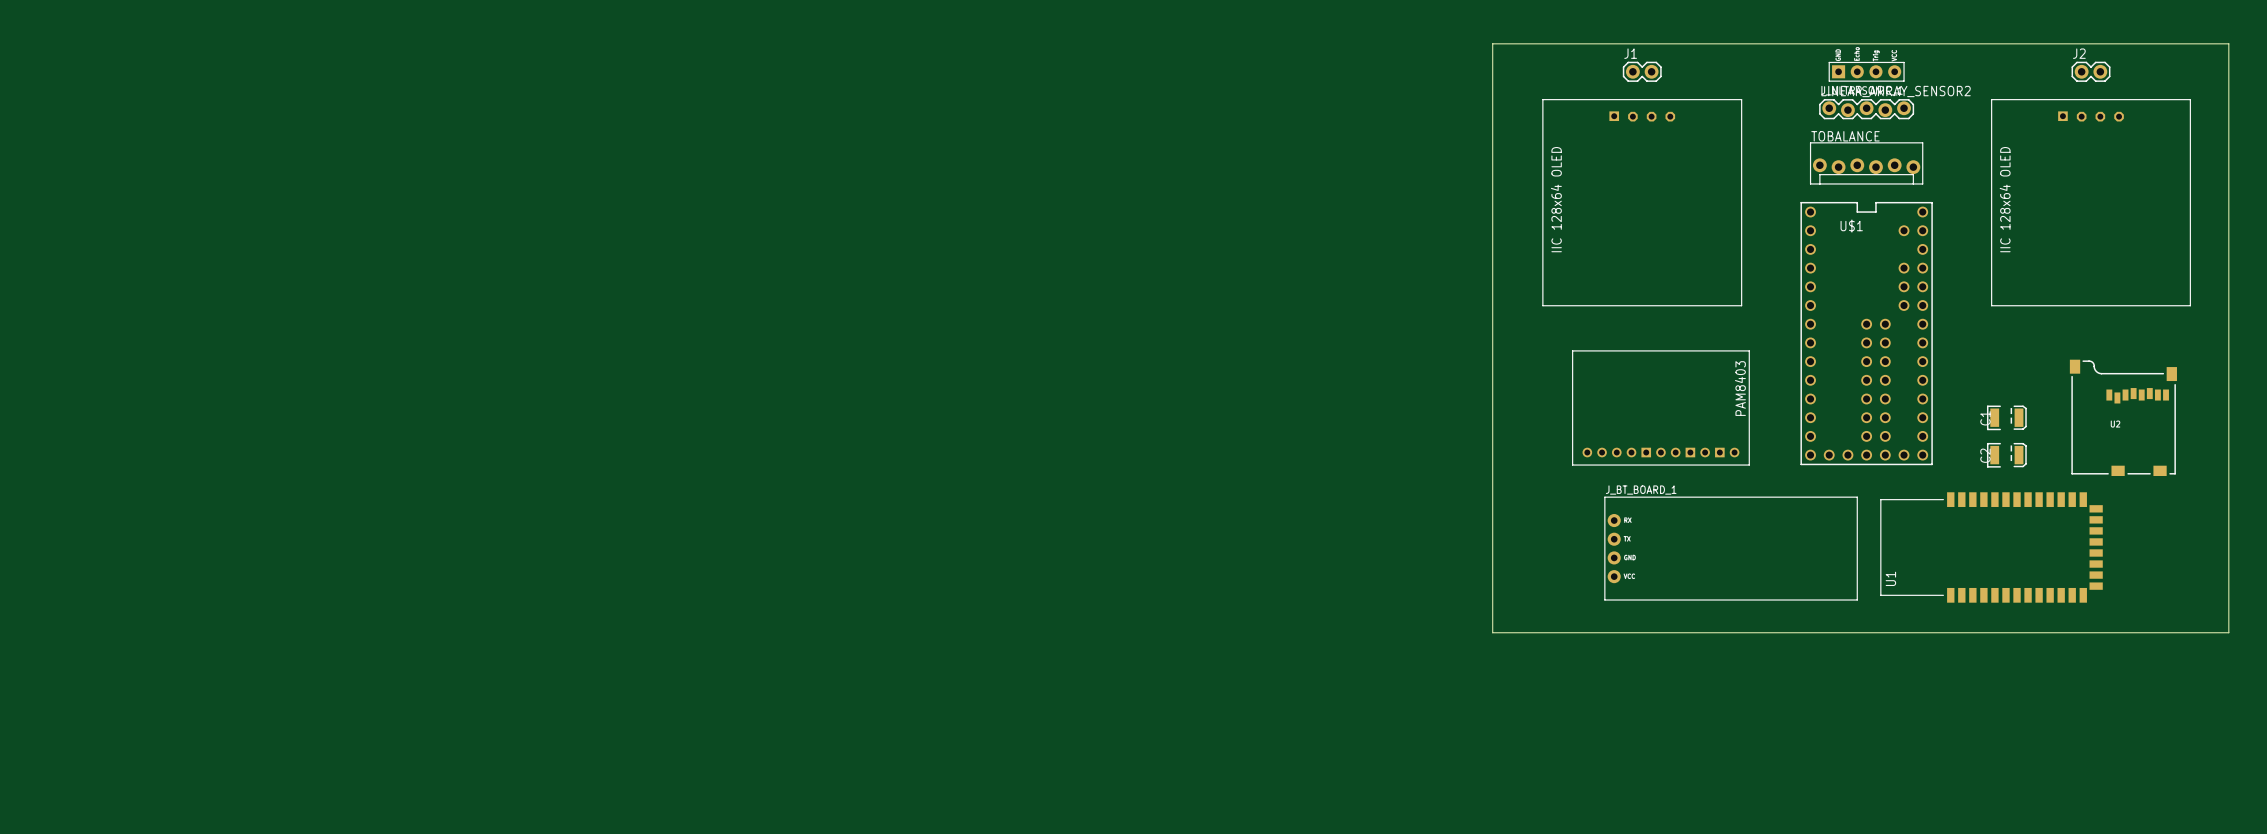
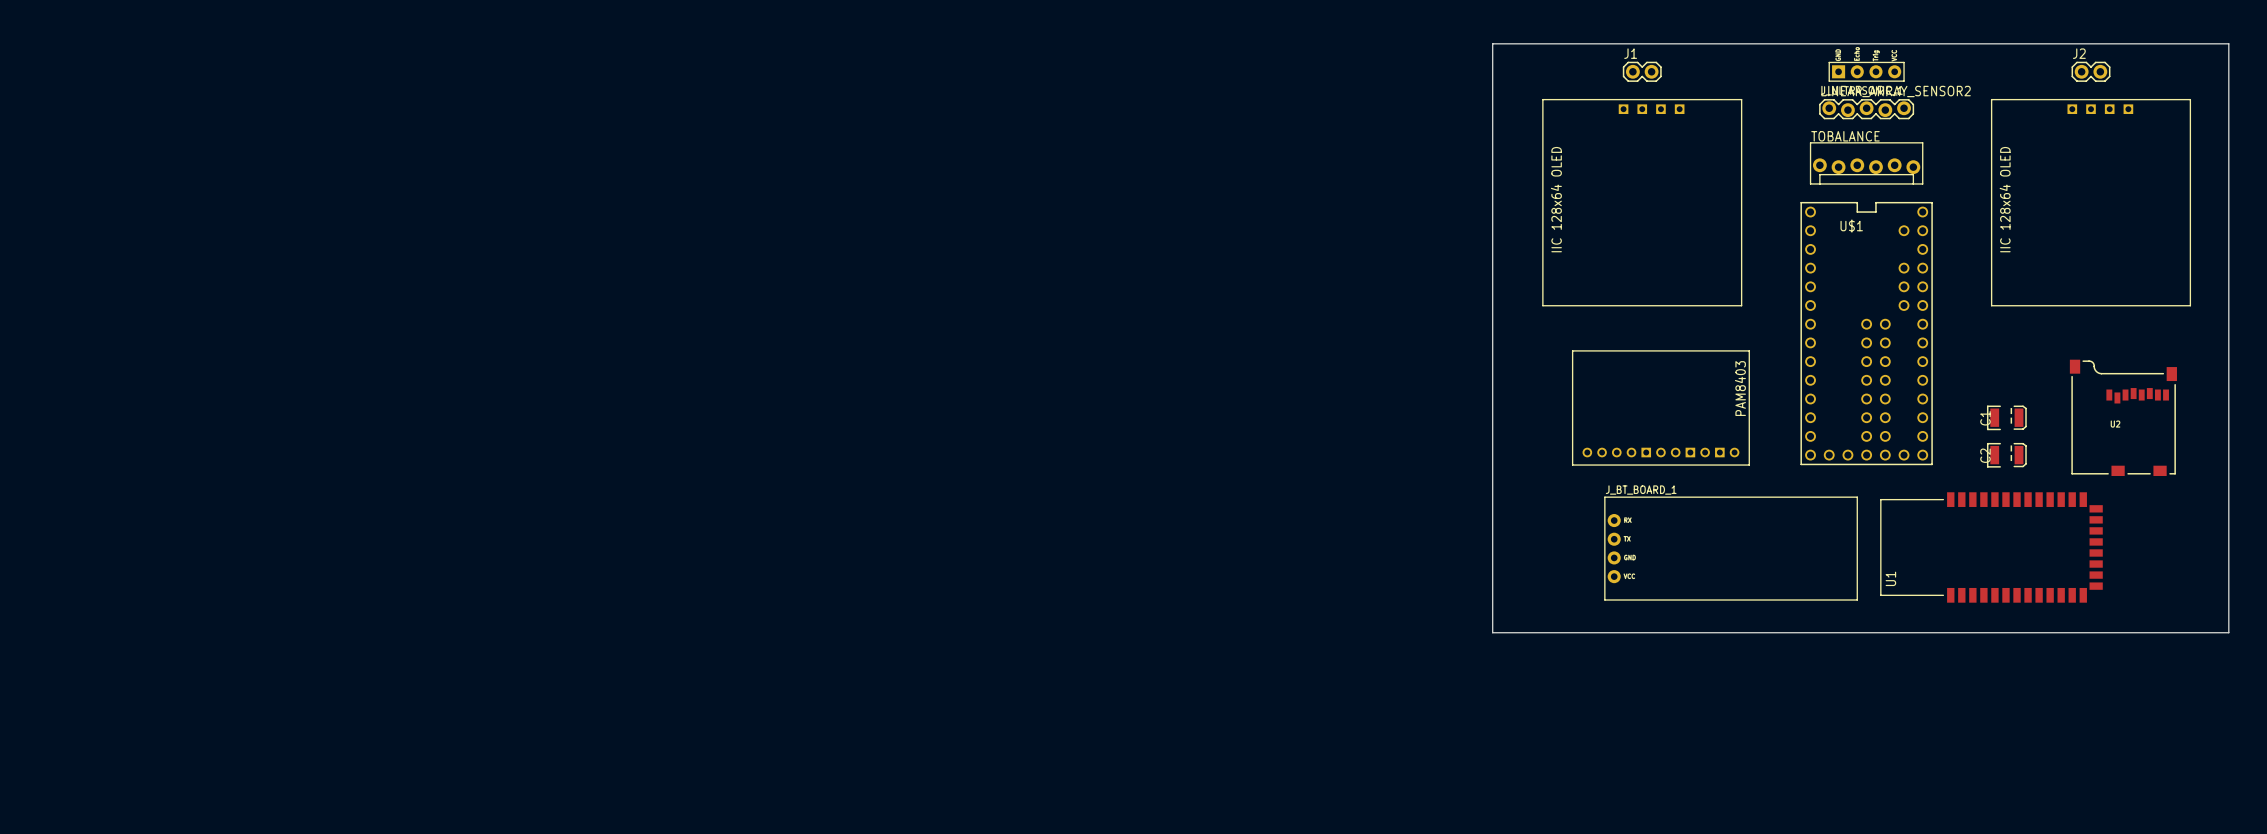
part footprint: [1542, 99, 1743, 307] -> [1542, 99, 1743, 307]
part footprint: [1991, 99, 2191, 307] -> [1991, 99, 2191, 307]

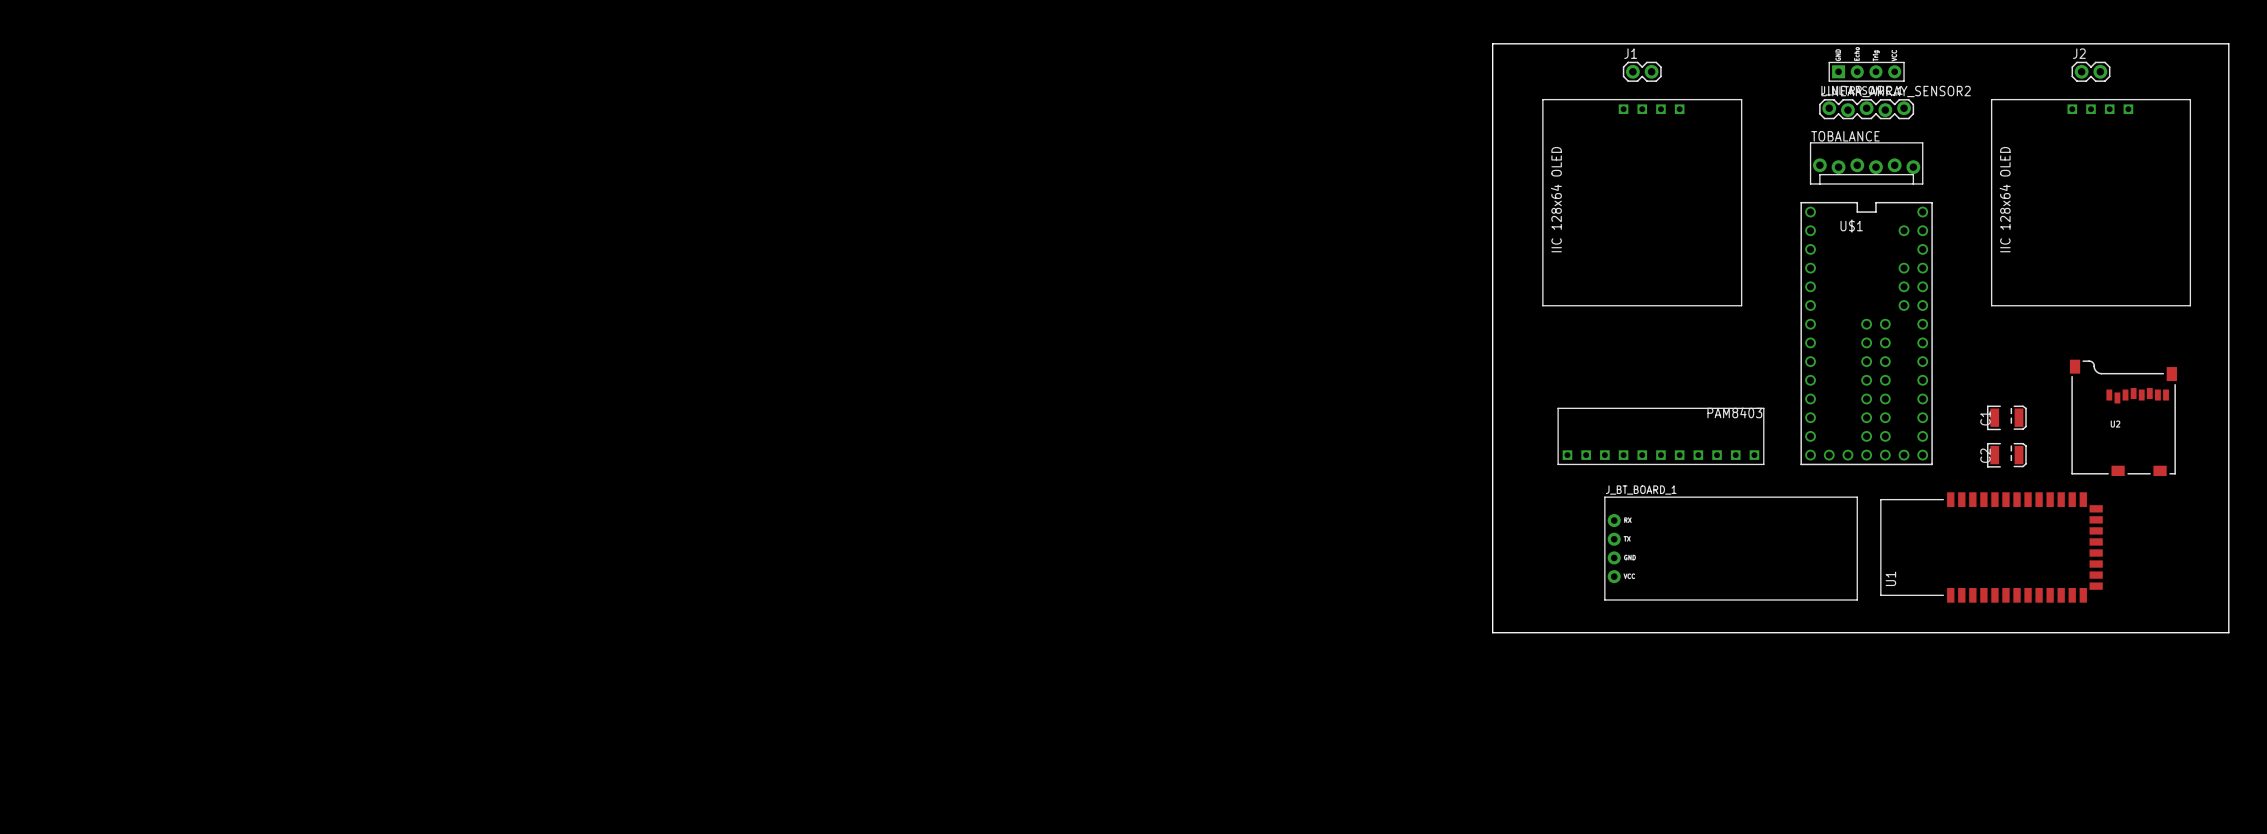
part: (1660, 407) -> none
part: none -> (1660, 436)

